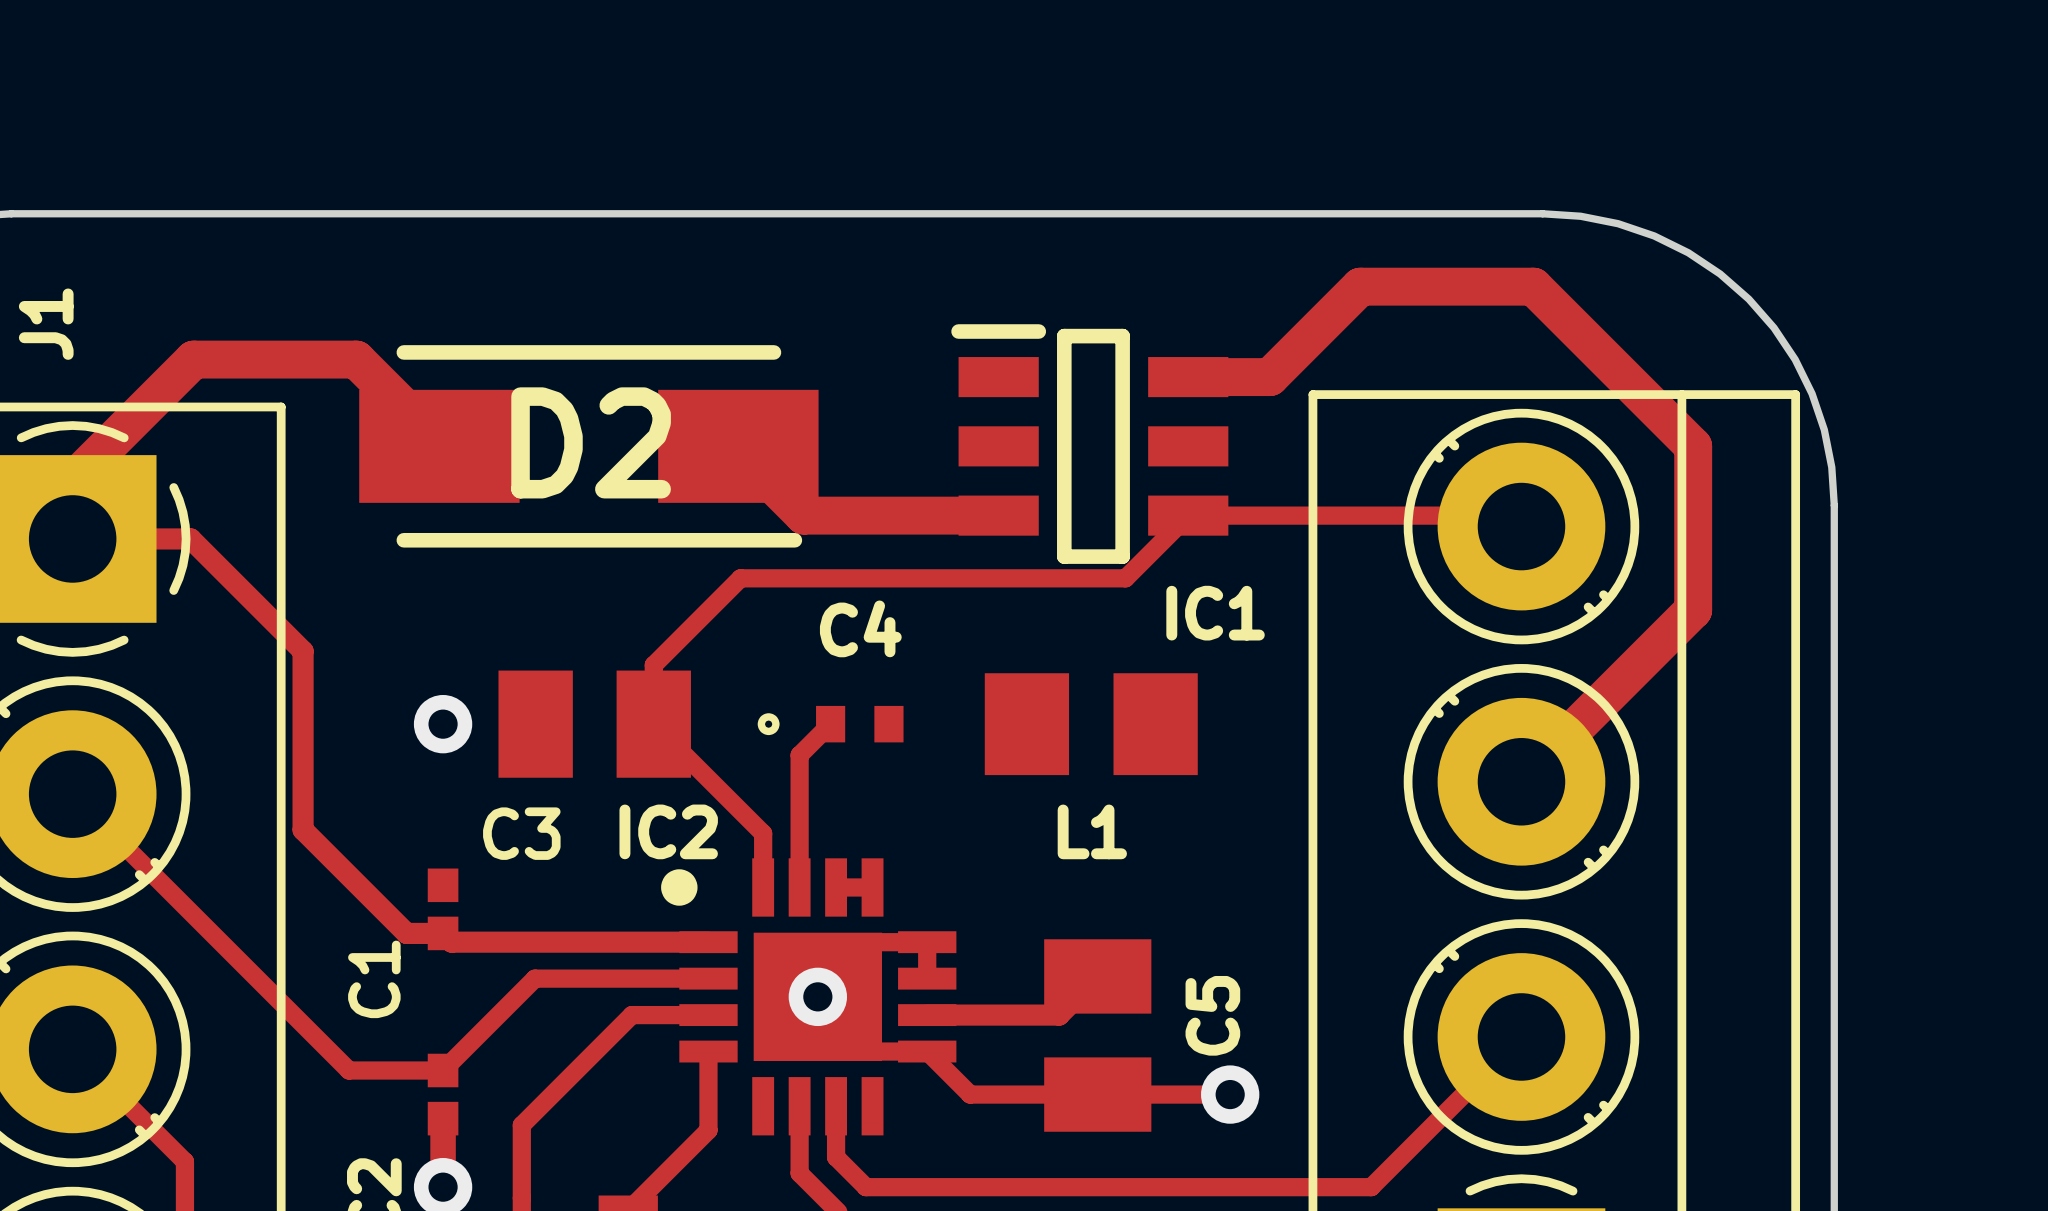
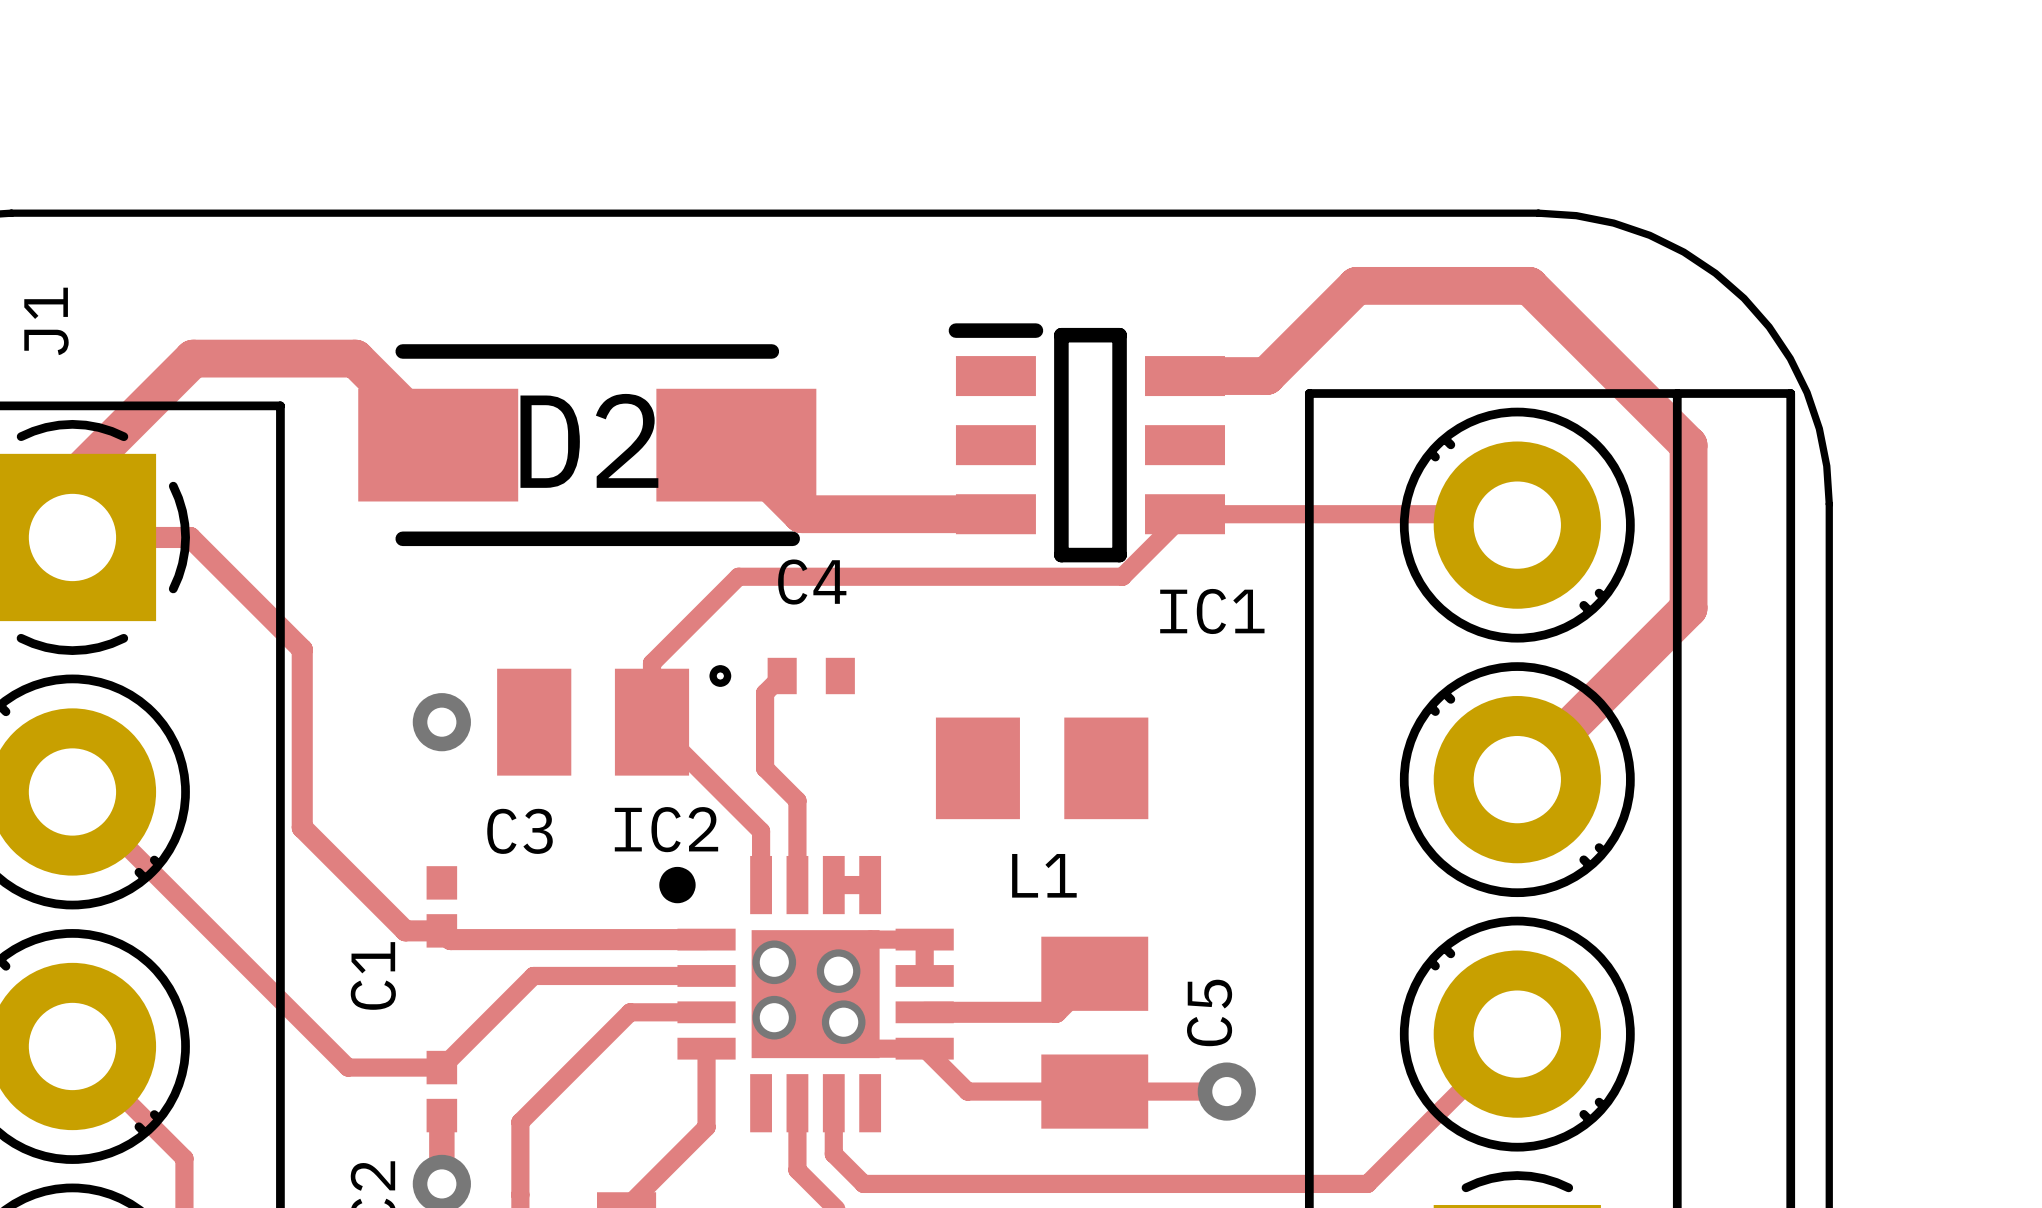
track: (830, 724) (799, 755) (799, 802) -> (782, 676) (765, 693) (765, 768) (797, 800)
C4 position: (830, 724) -> (782, 676)
L1 position: (1091, 724) -> (1042, 768)
via: none -> (774, 962)
via: none -> (838, 971)
via: (817, 996) -> none
via: none -> (774, 1017)
via: none -> (843, 1022)

